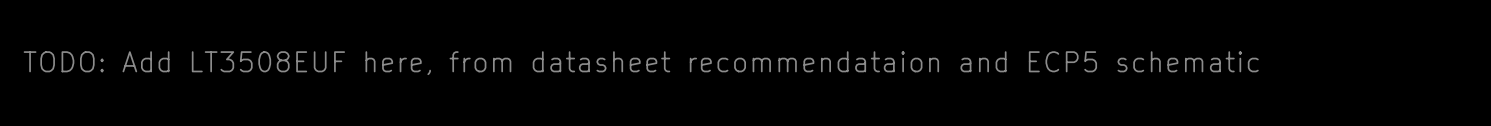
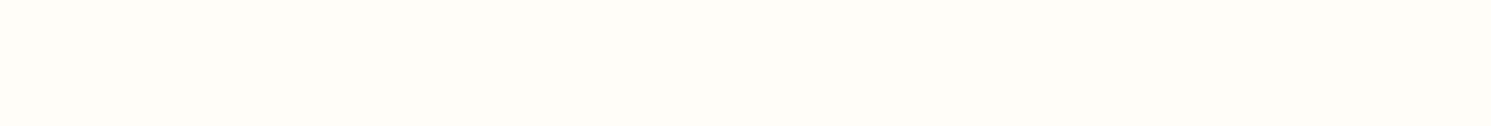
text: TODO: Add LT3508EUF here, from datasheet recommendataion and ECP5 schematic (641, 63) -> none

